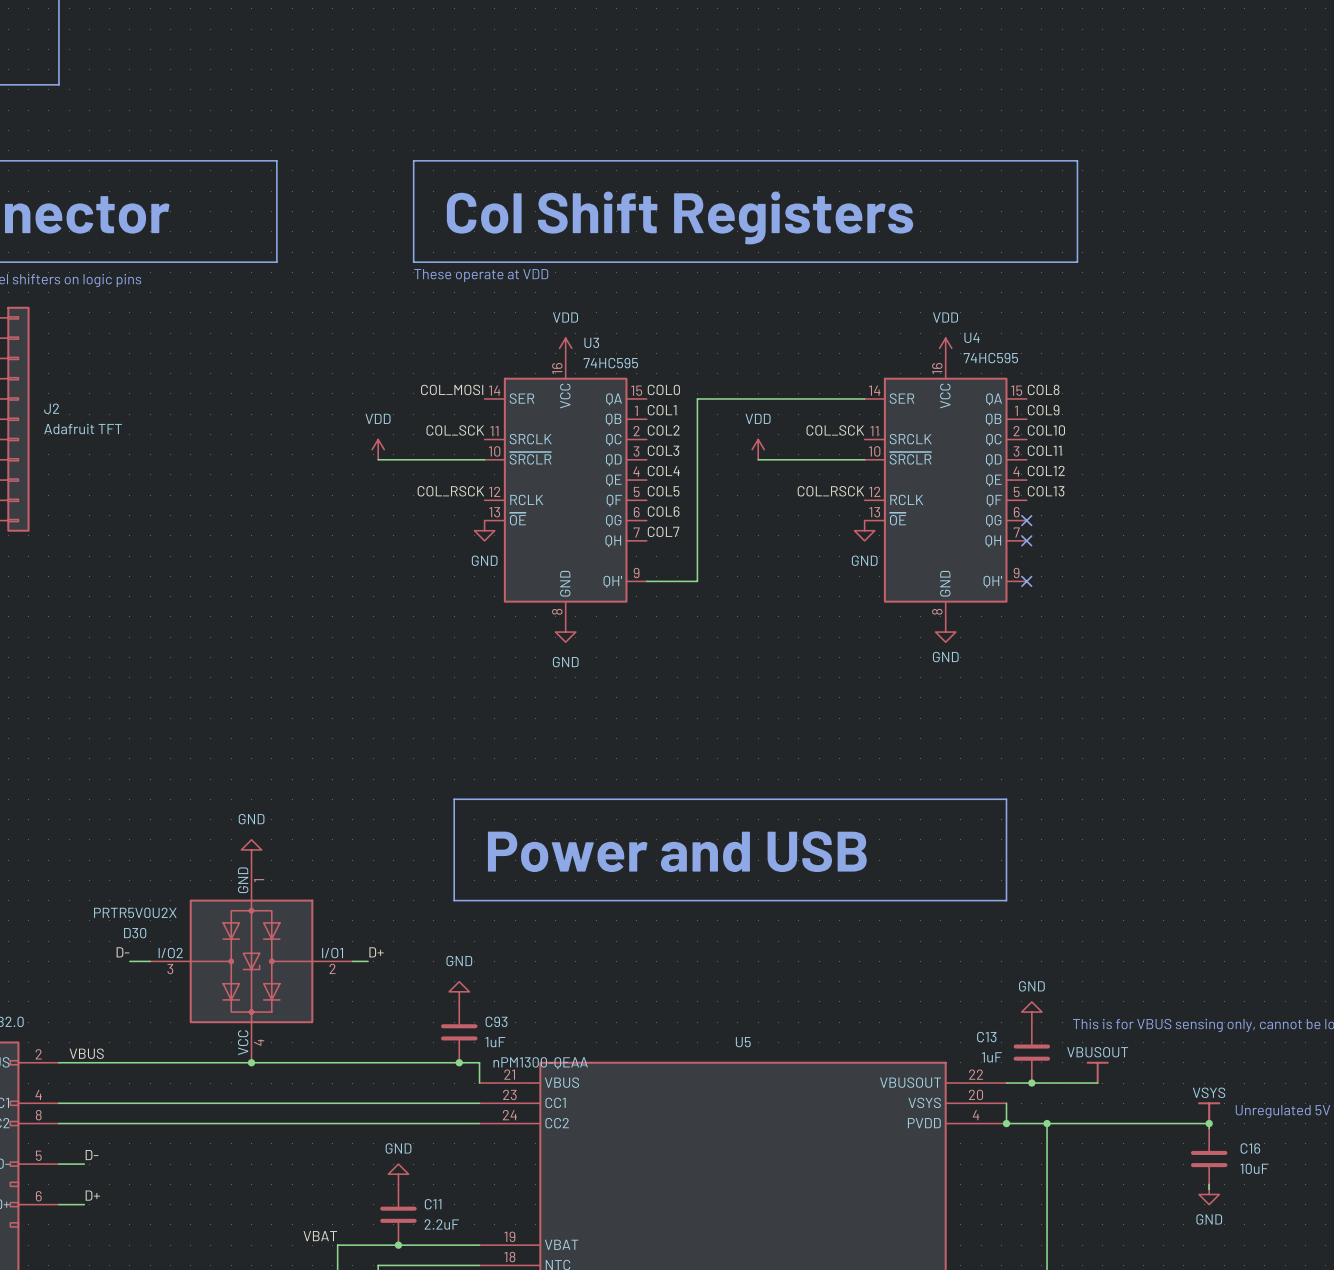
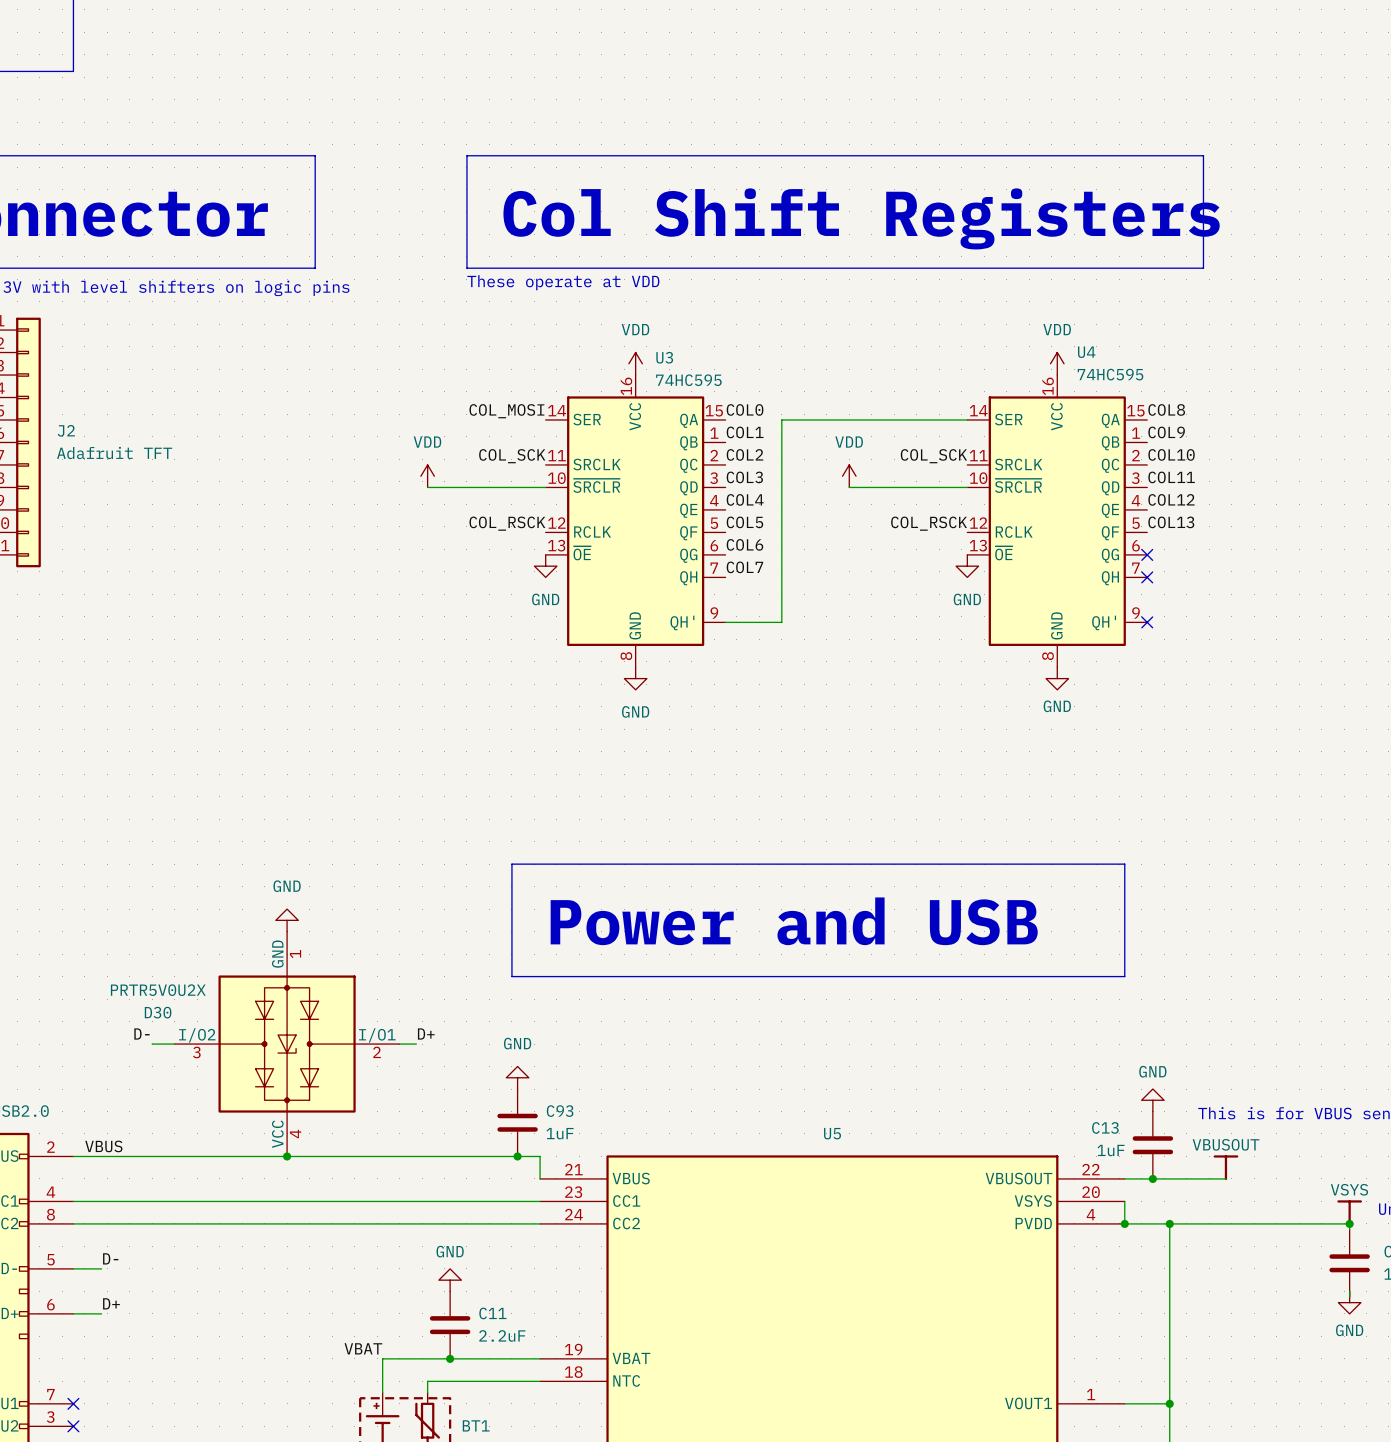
U5 value: nPM1300-QEAA (540, 1063) -> none

